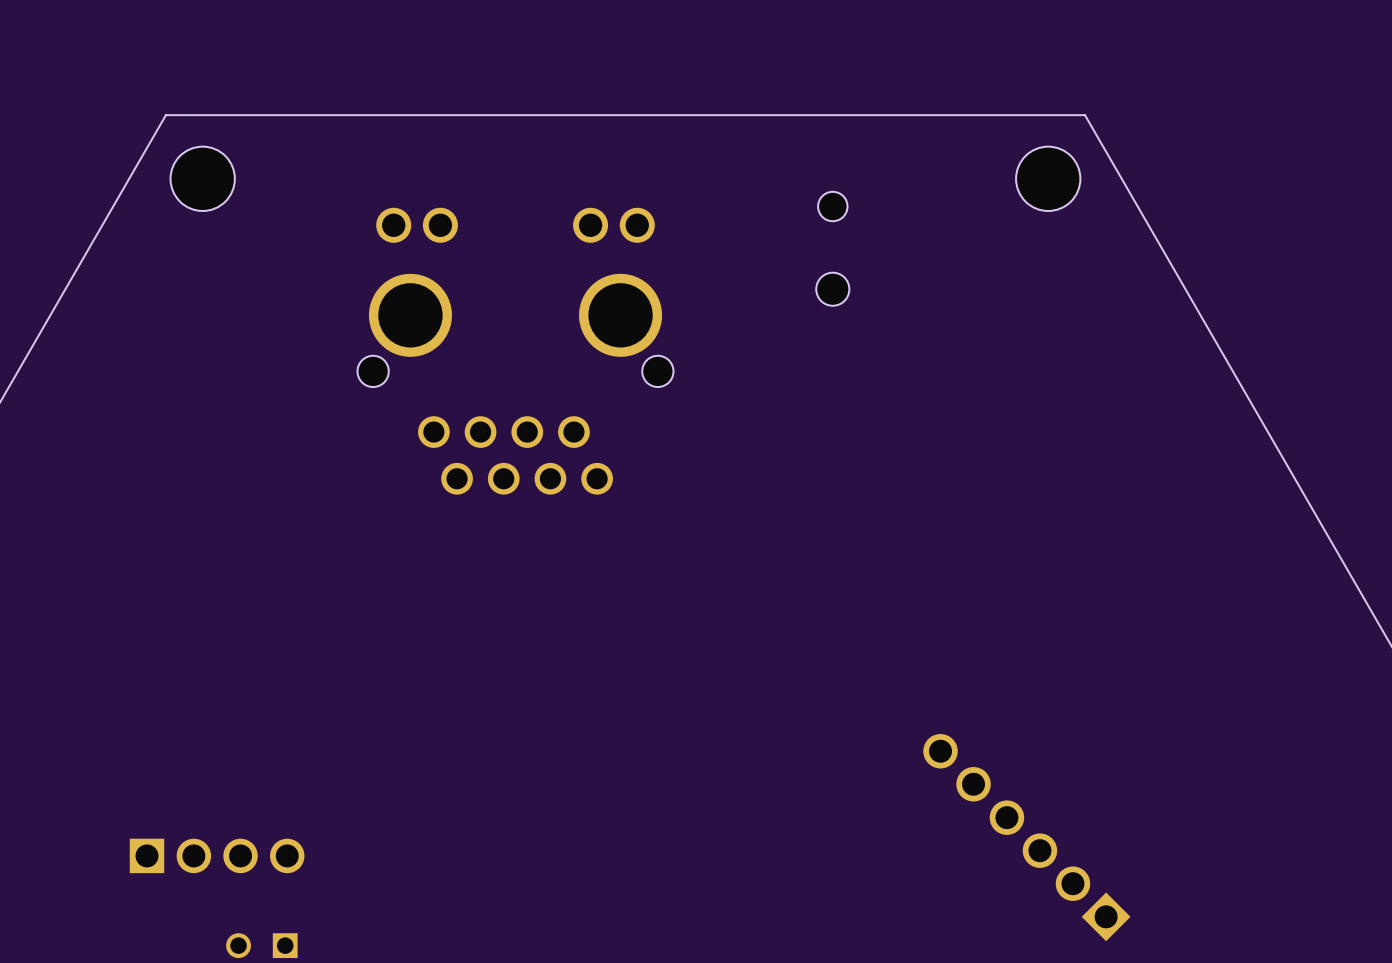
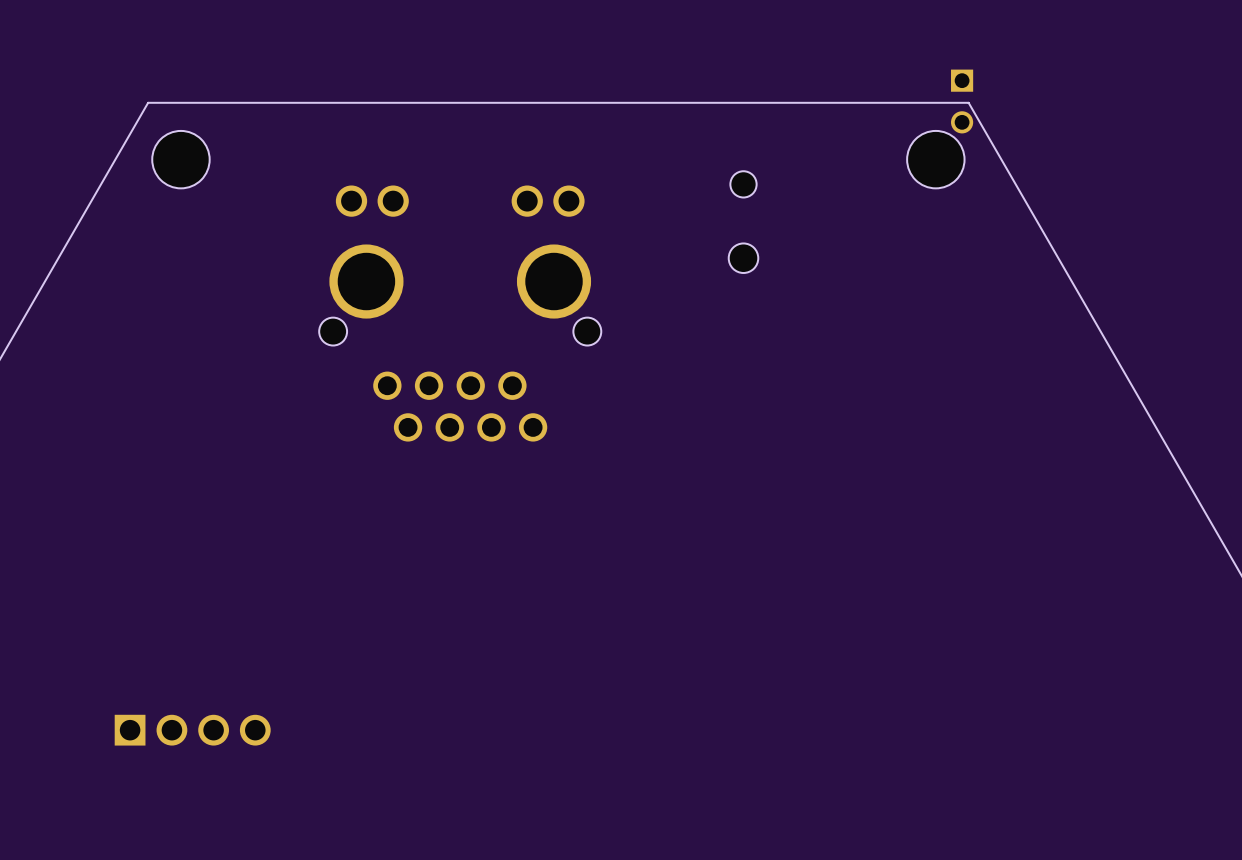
part: none -> (962, 101)
part: (1026, 837) -> none
part position: (217, 855) -> (192, 730)
part: (261, 945) -> none

